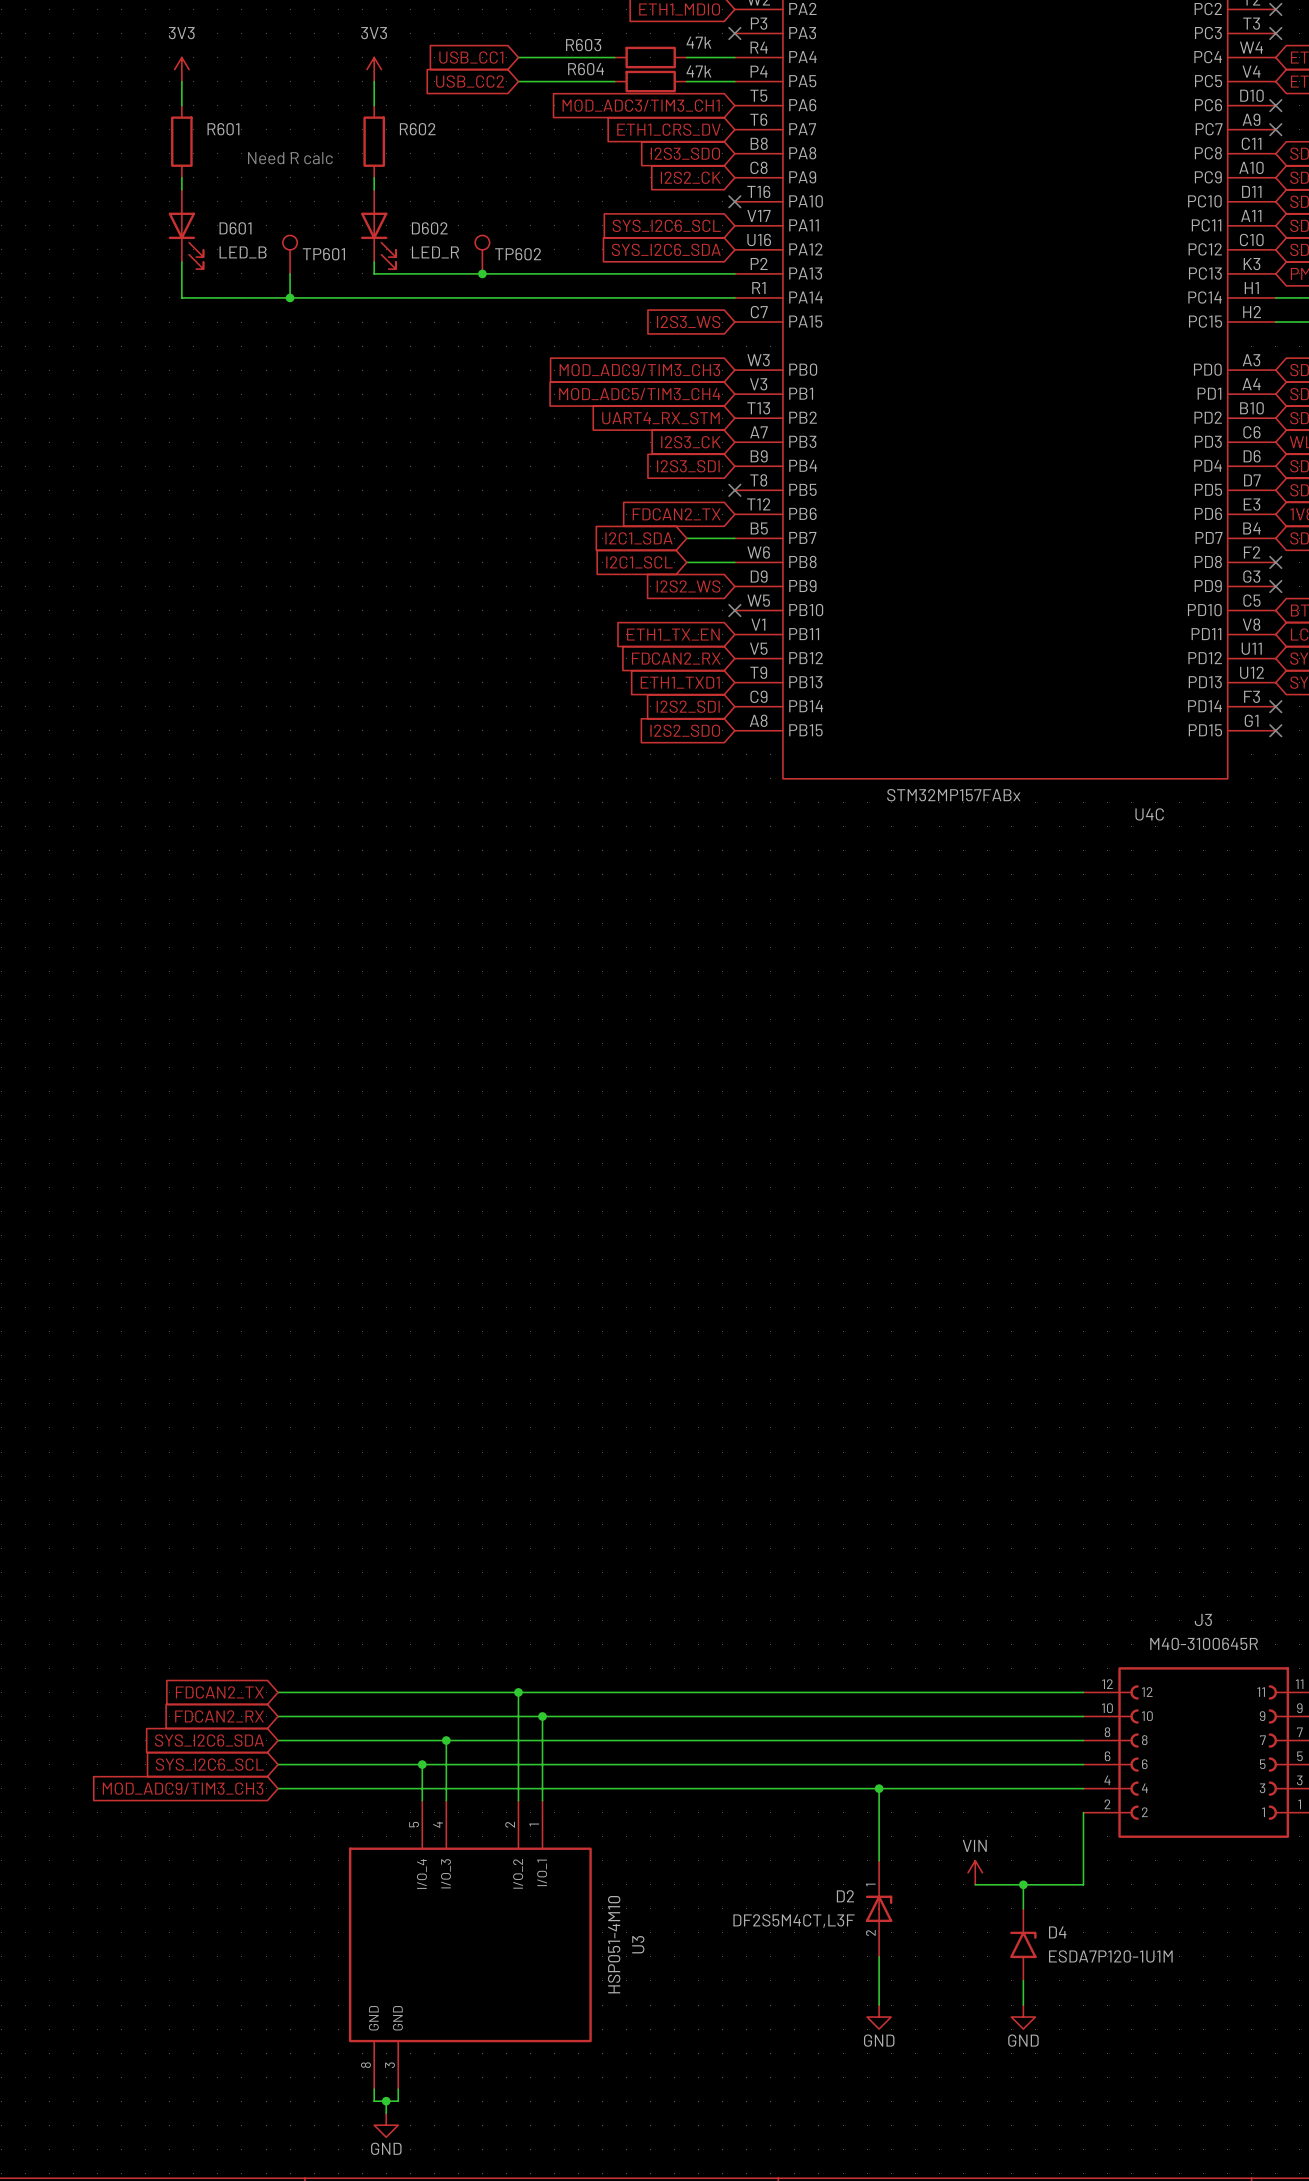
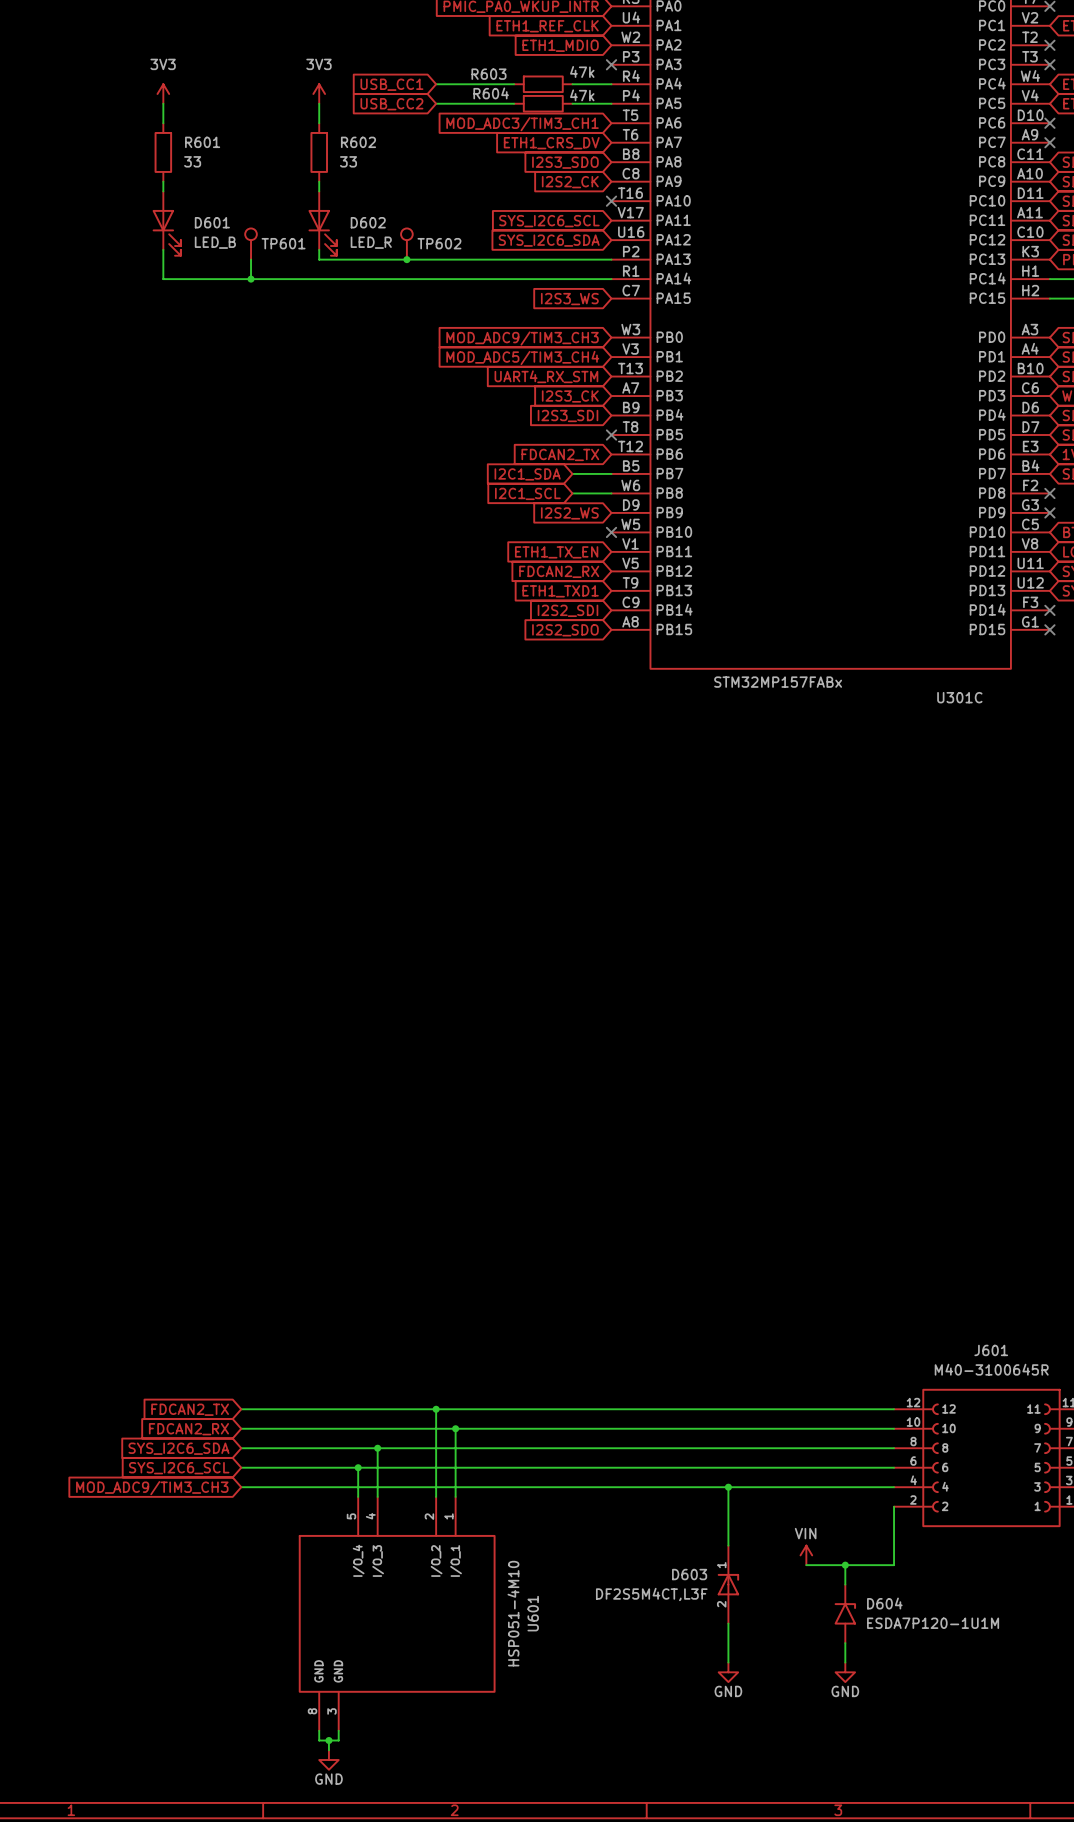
R601 value: none -> 33 (192, 161)
R602 value: none -> 33 (348, 161)
text: Need R calc (290, 158) -> none
U4C name: U4C (1149, 814) -> U301C (959, 697)
J3 name: J3 (1203, 1619) -> J601 (991, 1350)
D2 name: D2 (845, 1896) -> D603 (689, 1574)
D4 name: D4 (1057, 1932) -> D604 (884, 1603)
U3 name: U3 (638, 1944) -> U601 (533, 1613)

